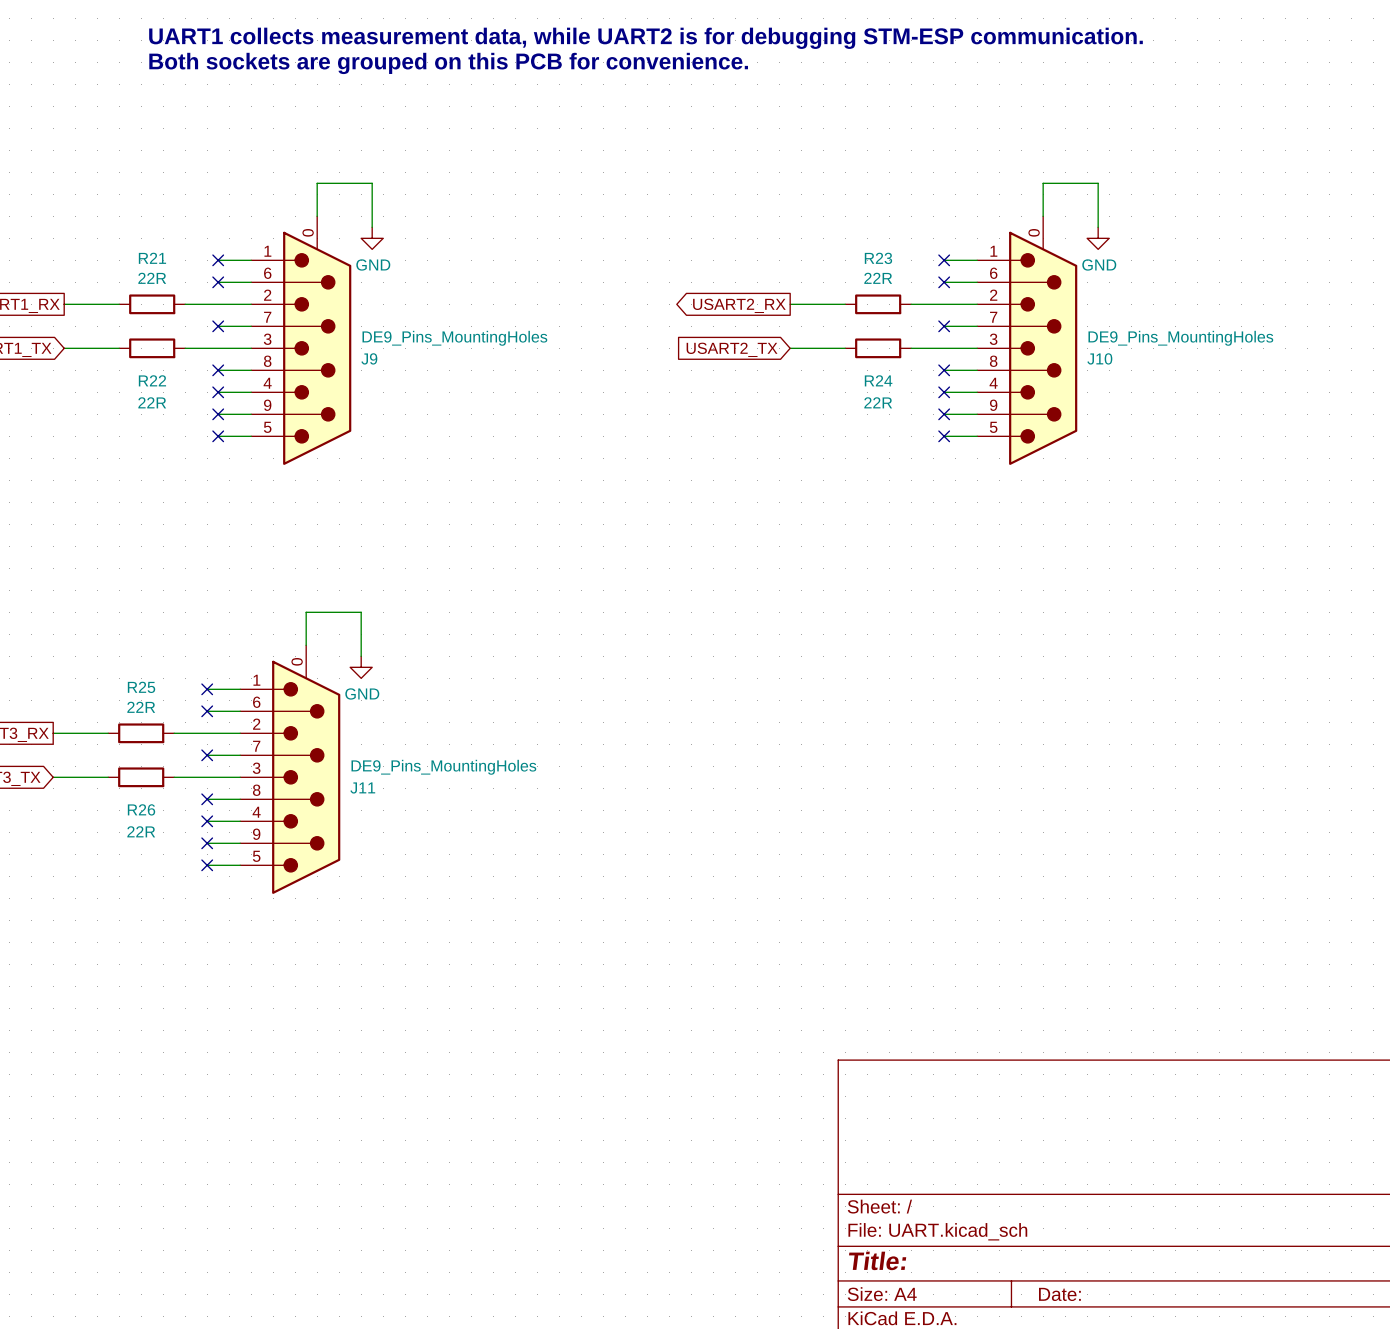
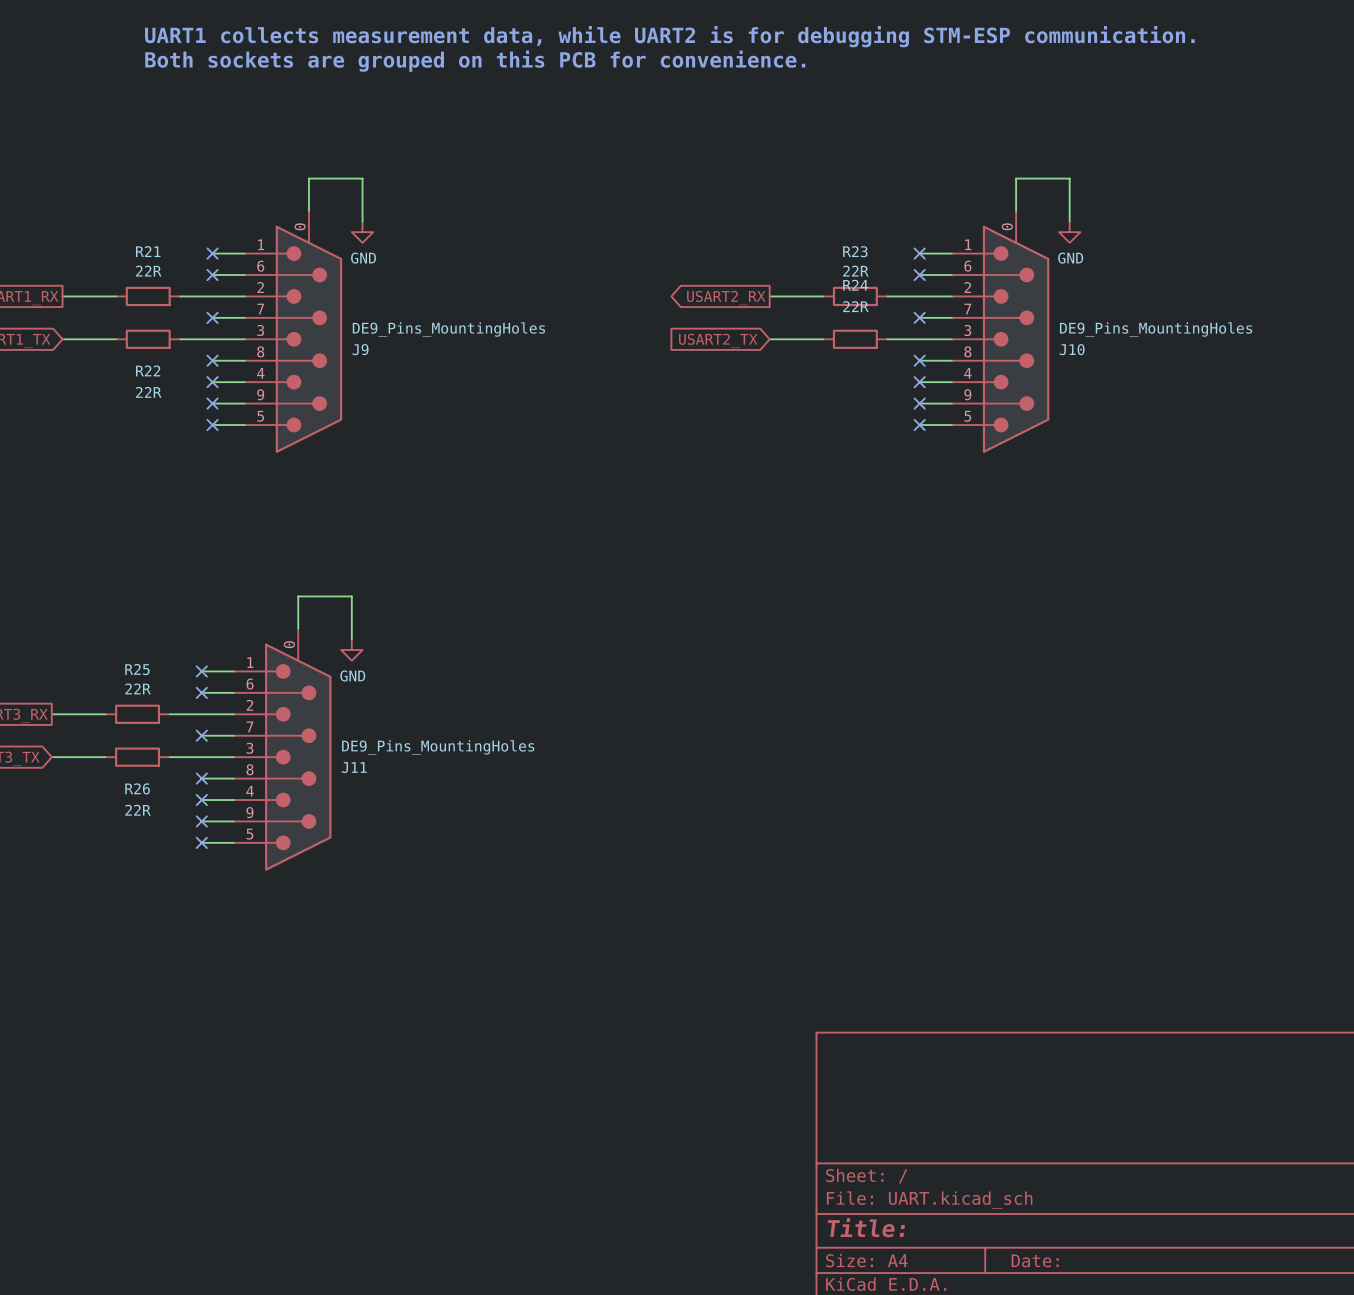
R24 name position: R24 (878, 380) -> R24 (855, 285)
R24 value position: 22R (878, 402) -> 22R (855, 306)

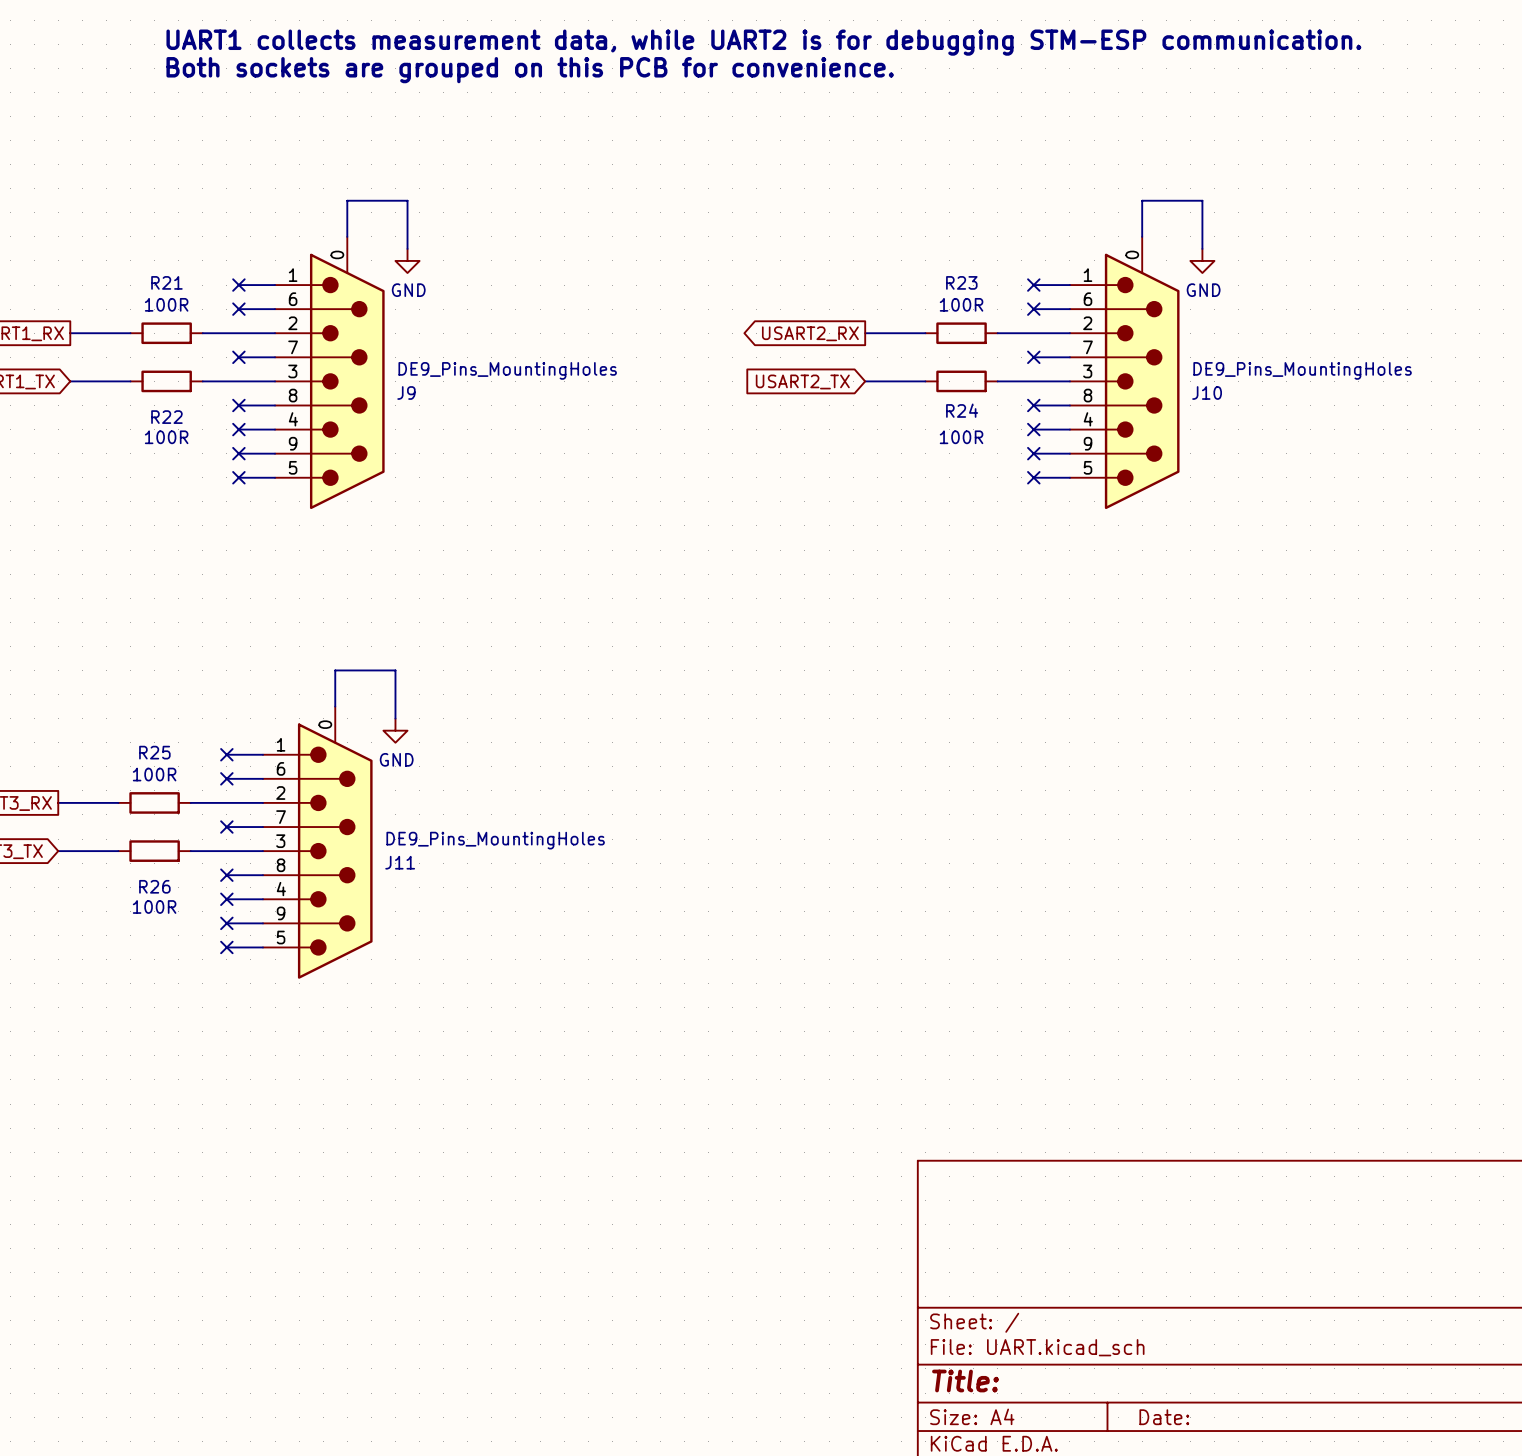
R21 value: 22R (148, 271) -> 100R (166, 304)
R23 value: 22R (855, 271) -> 100R (961, 304)
R24 name position: R24 (855, 285) -> R24 (962, 410)
R24 value: 22R (855, 306) -> 100R (961, 437)
R22 value: 22R (148, 392) -> 100R (166, 437)
R25 value: 22R (138, 688) -> 100R (154, 774)
R26 value: 22R (138, 810) -> 100R (154, 907)

